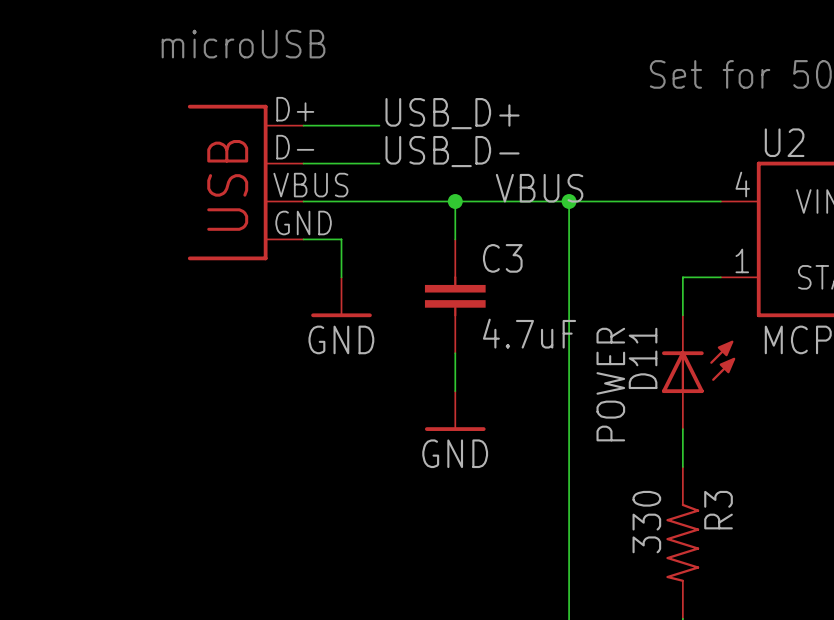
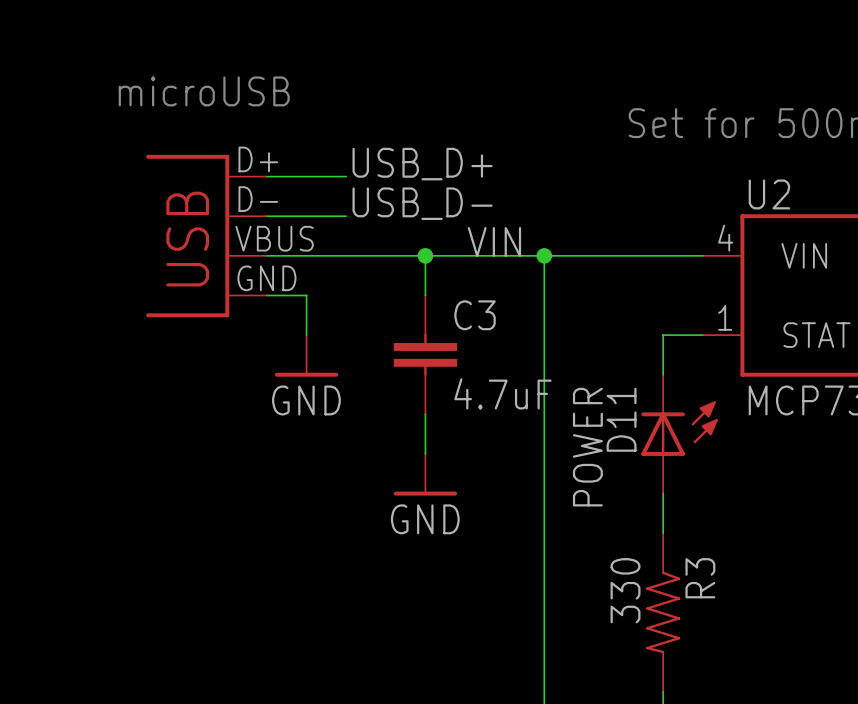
label: VBUS (539, 188) -> VIN (494, 241)

